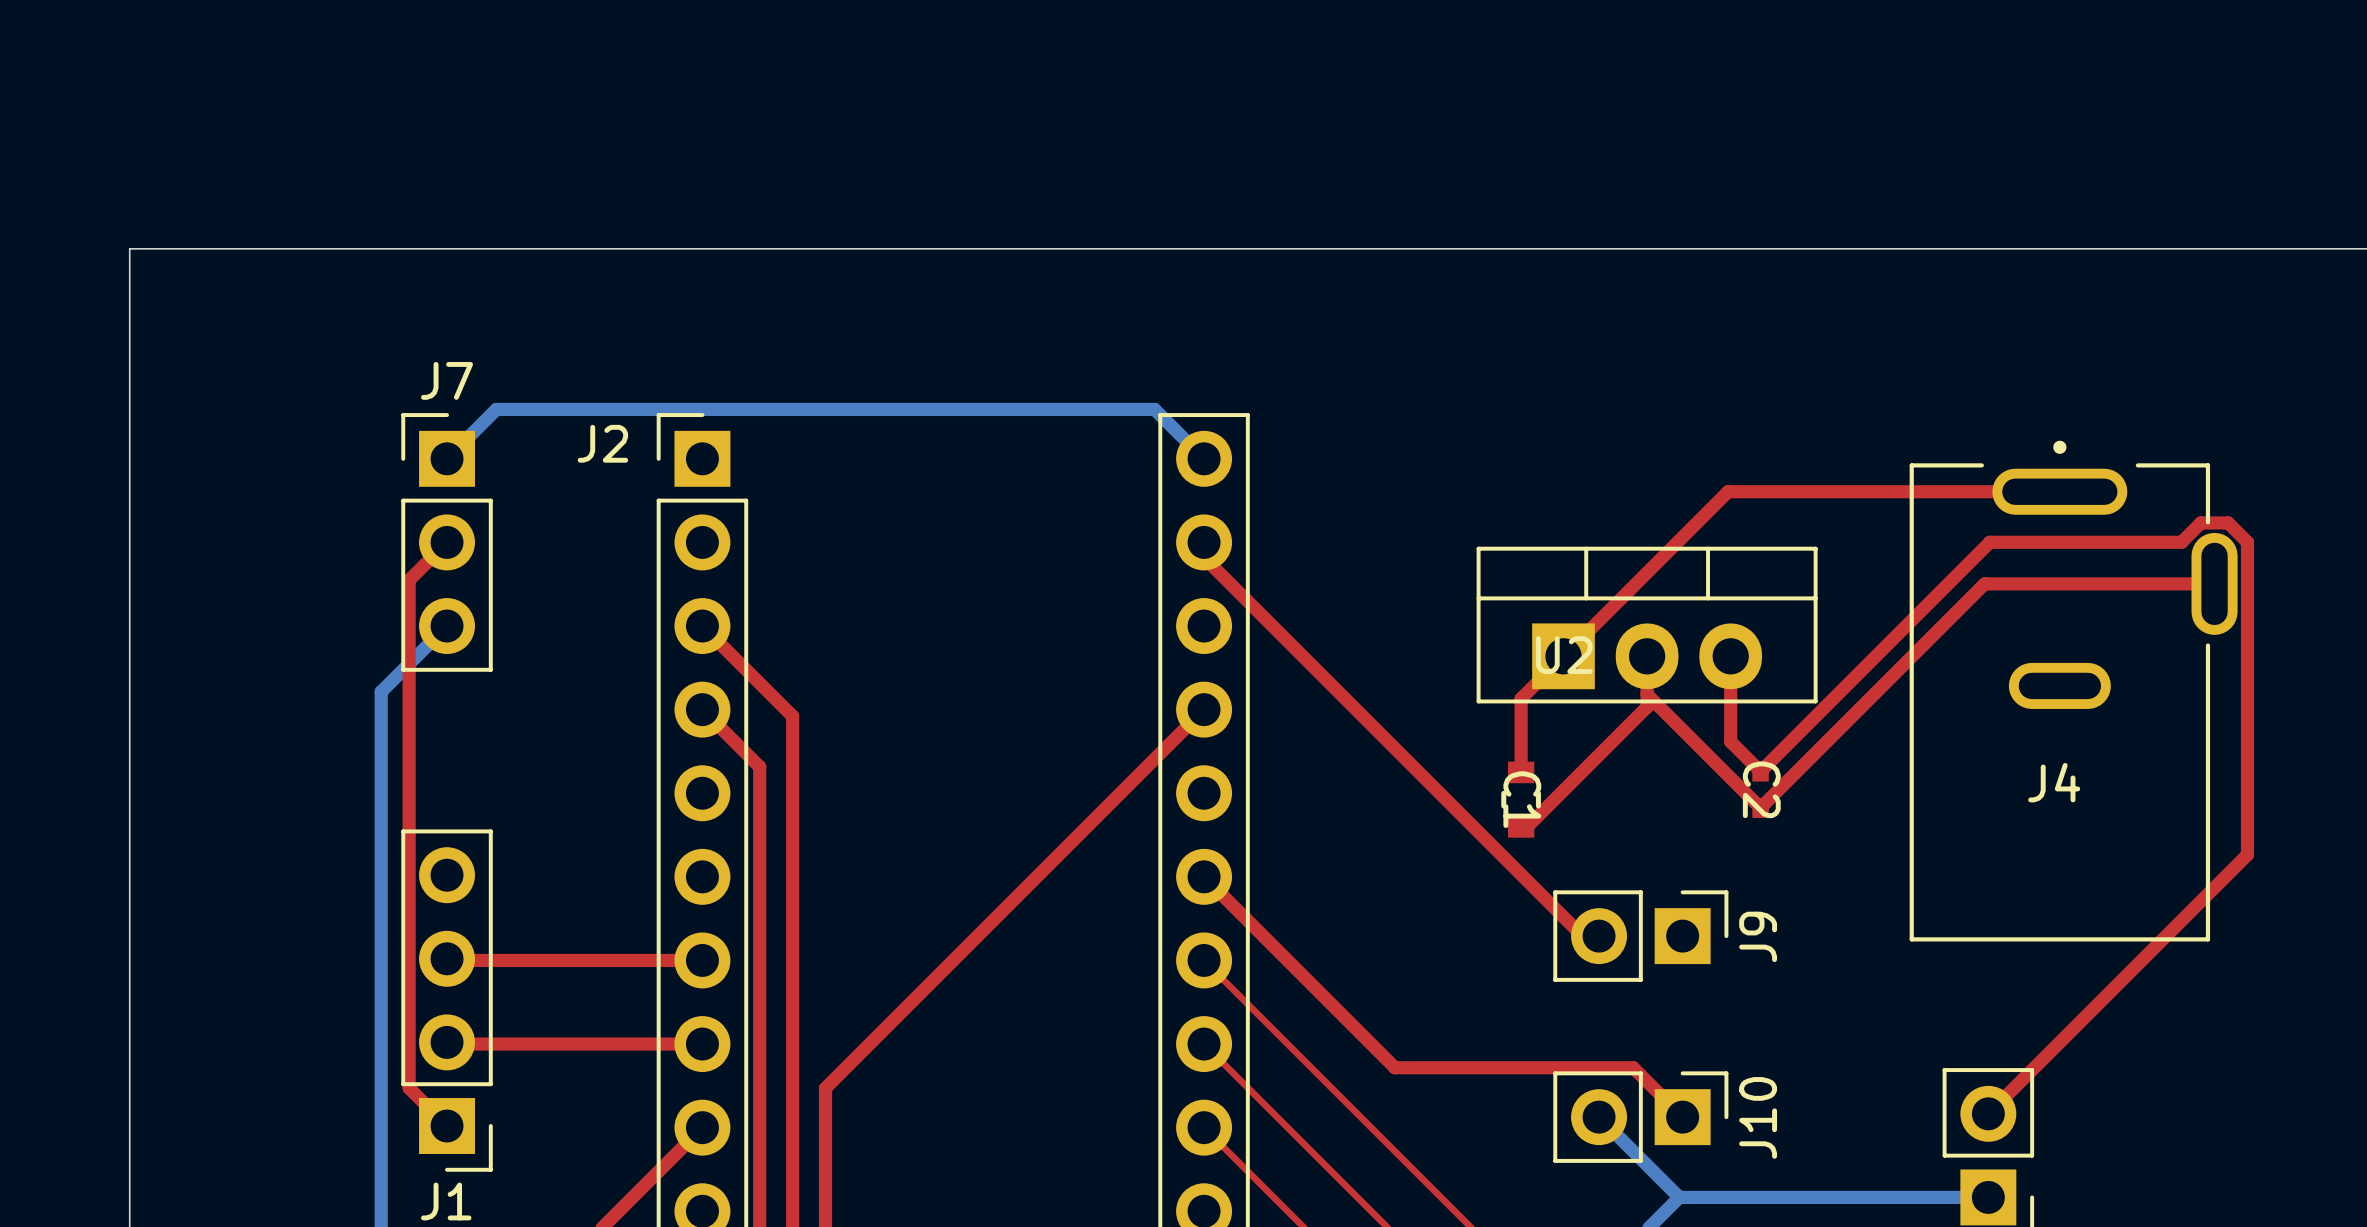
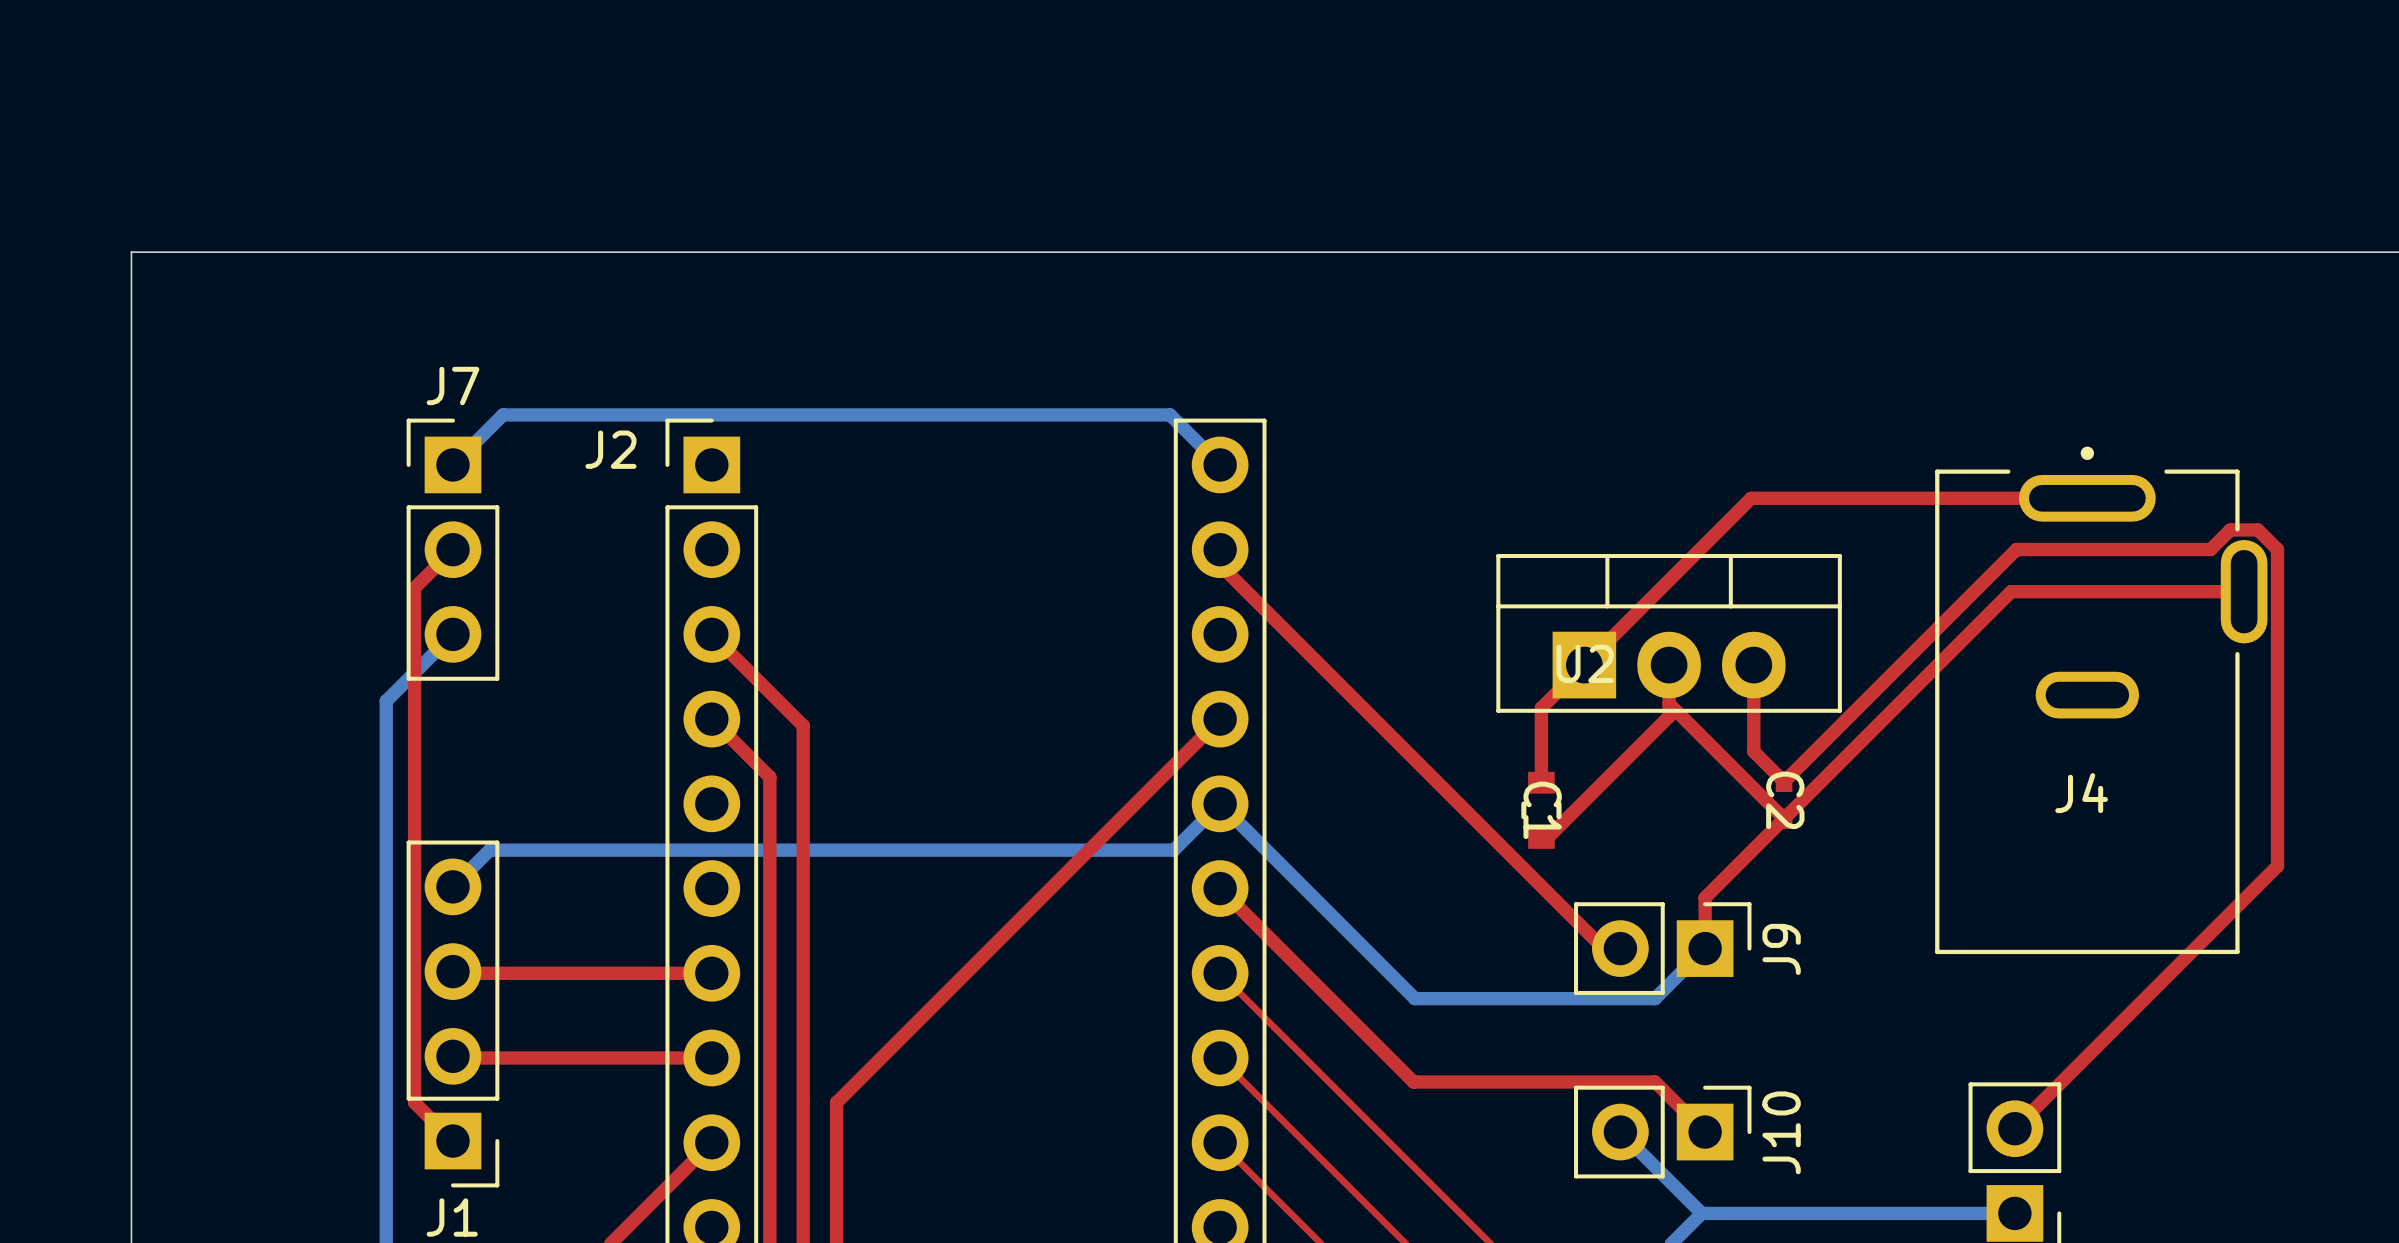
top track: none -> (1784, 818) (1705, 897) (1705, 948)
bottom track: none -> (452, 886) (489, 850) (1173, 850) (1220, 803) (1414, 998) (1655, 998) (1705, 948)

